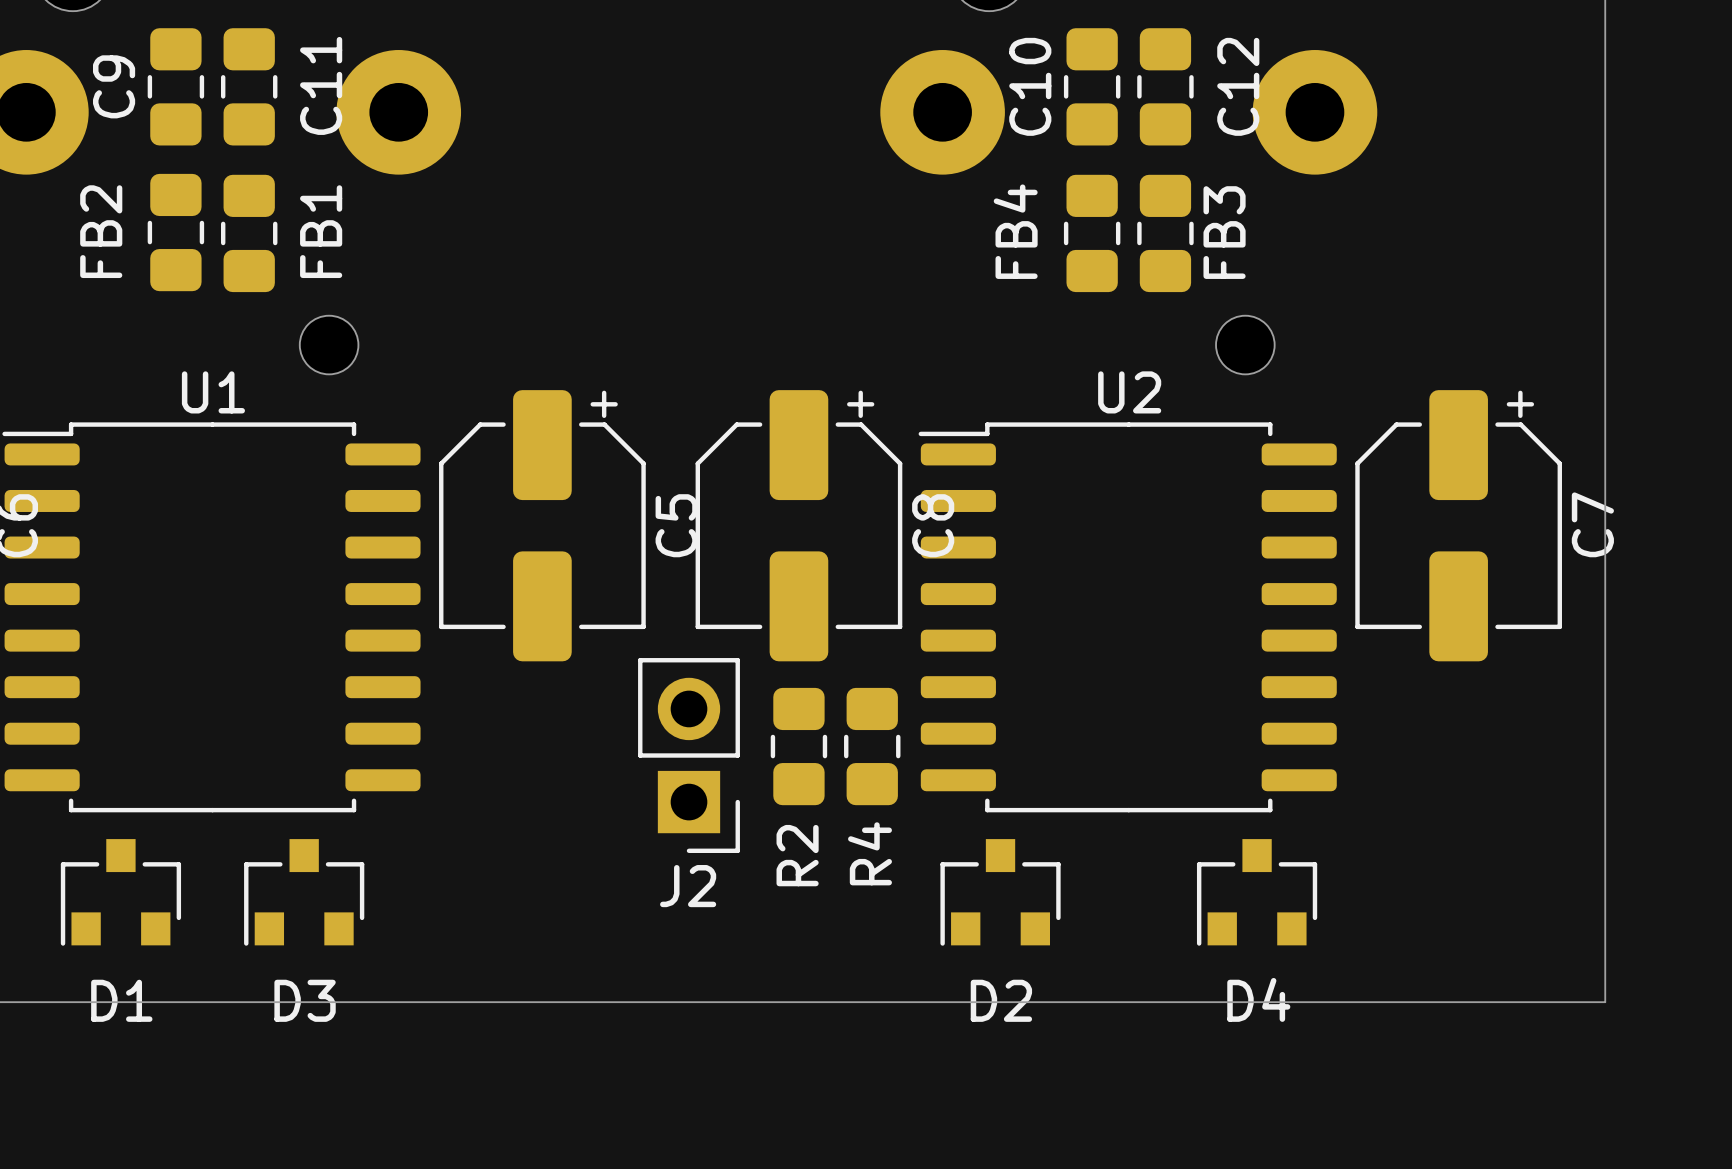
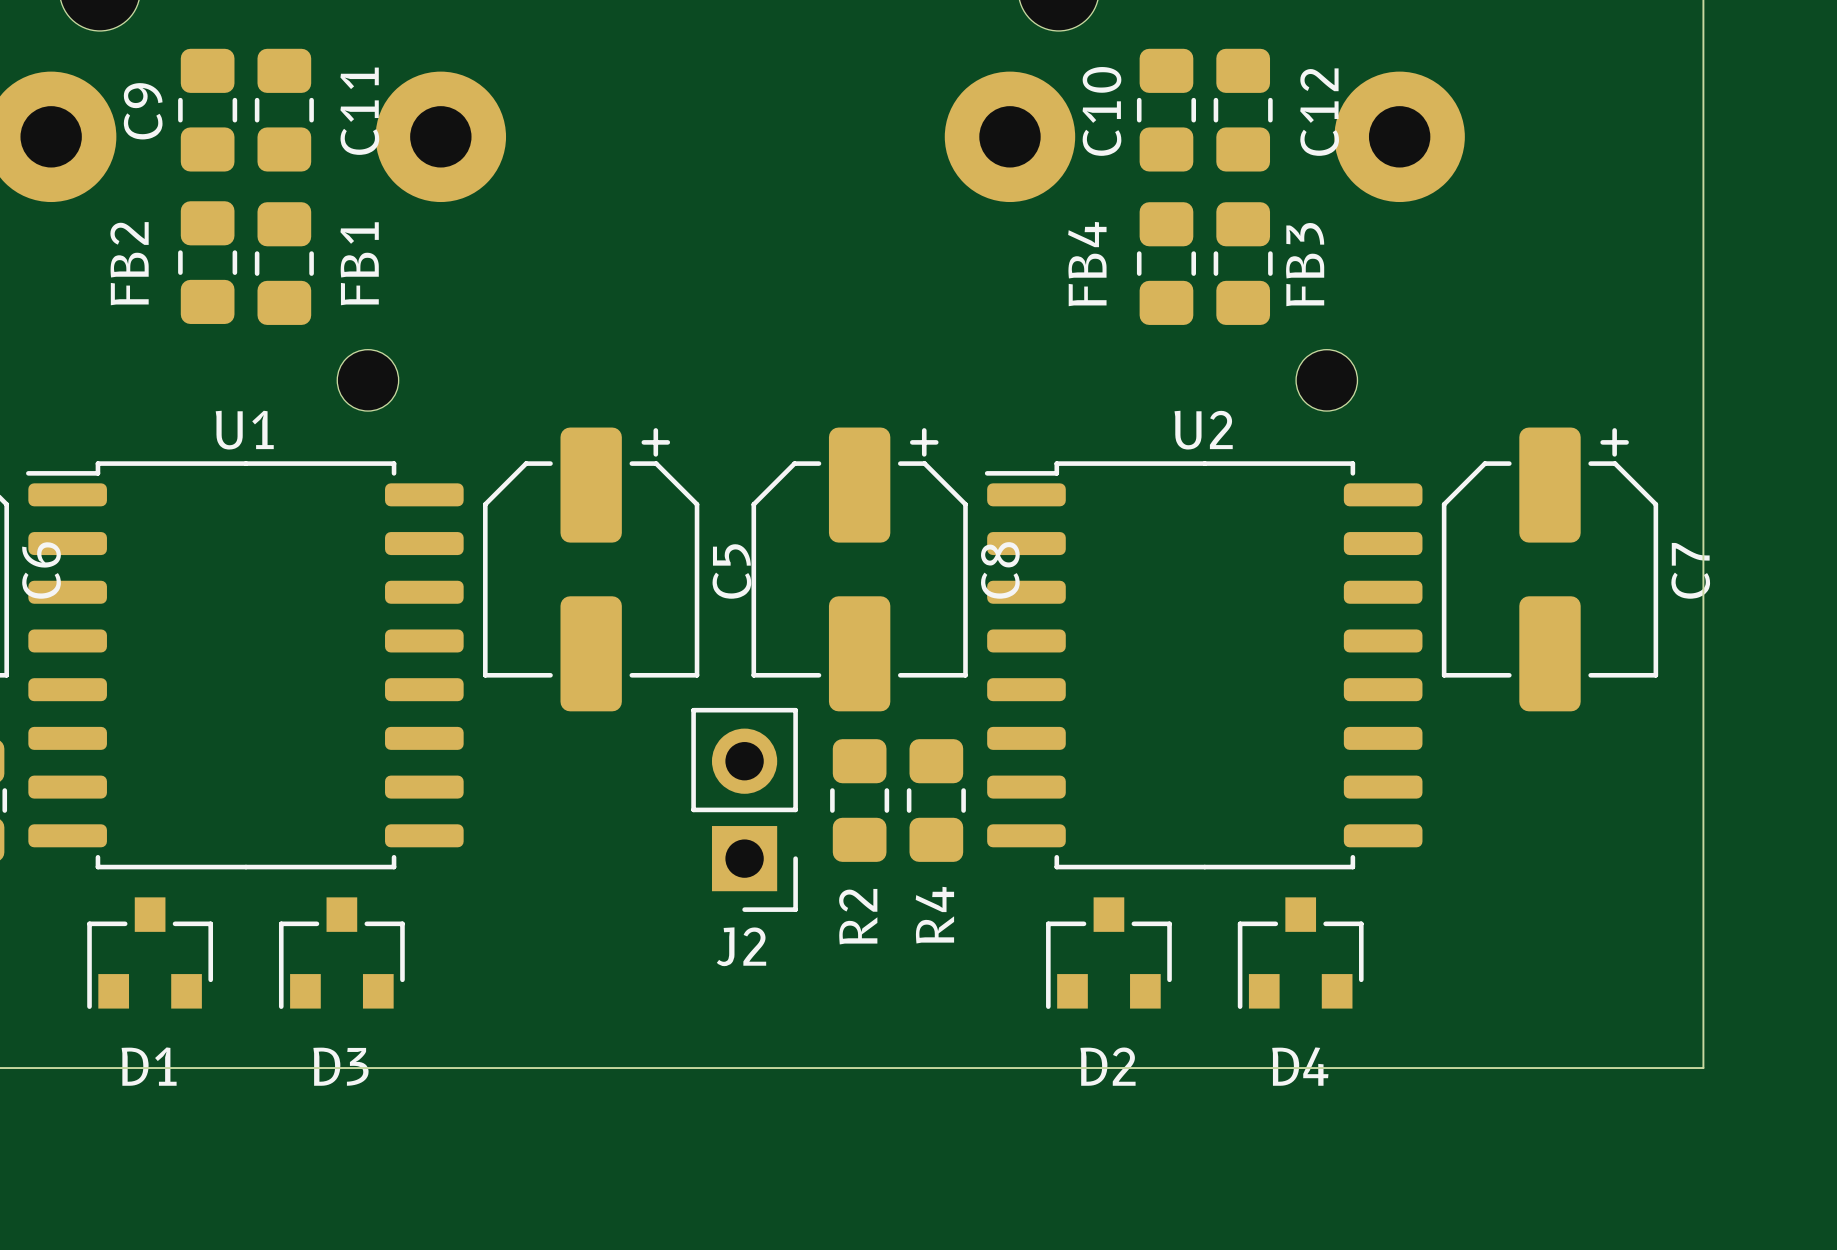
D2 position: (1000, 892) -> (1108, 953)
D4 position: (1257, 892) -> (1300, 953)

